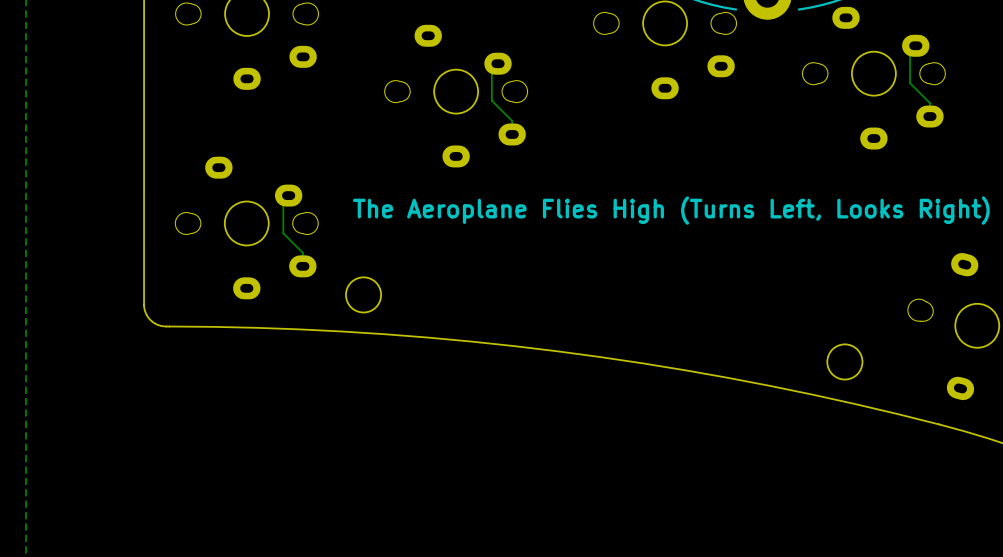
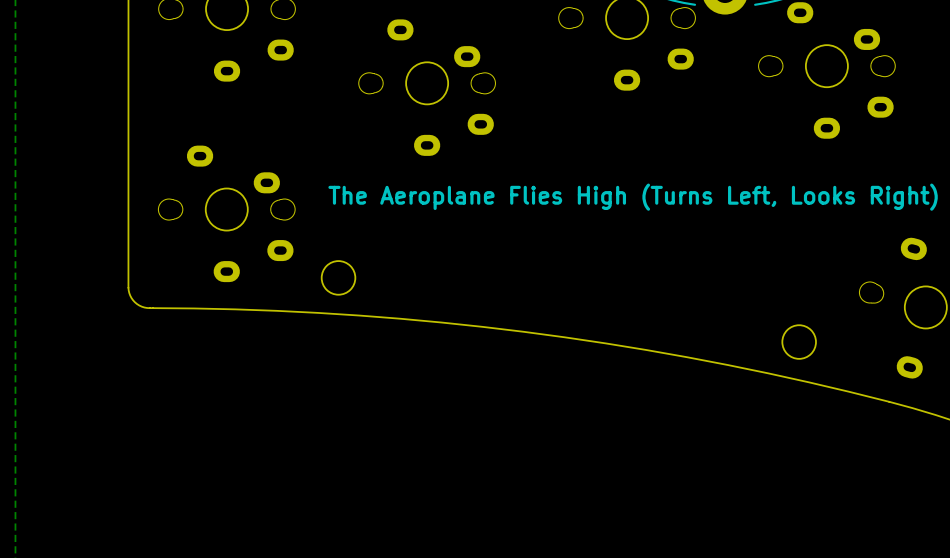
track: (915, 45) (910, 51) (910, 83) (929, 103) (929, 116) -> none
track: (498, 63) (491, 69) (491, 100) (512, 121) (512, 134) -> none
track: (288, 195) (283, 200) (283, 233) (302, 252) (302, 266) -> none

